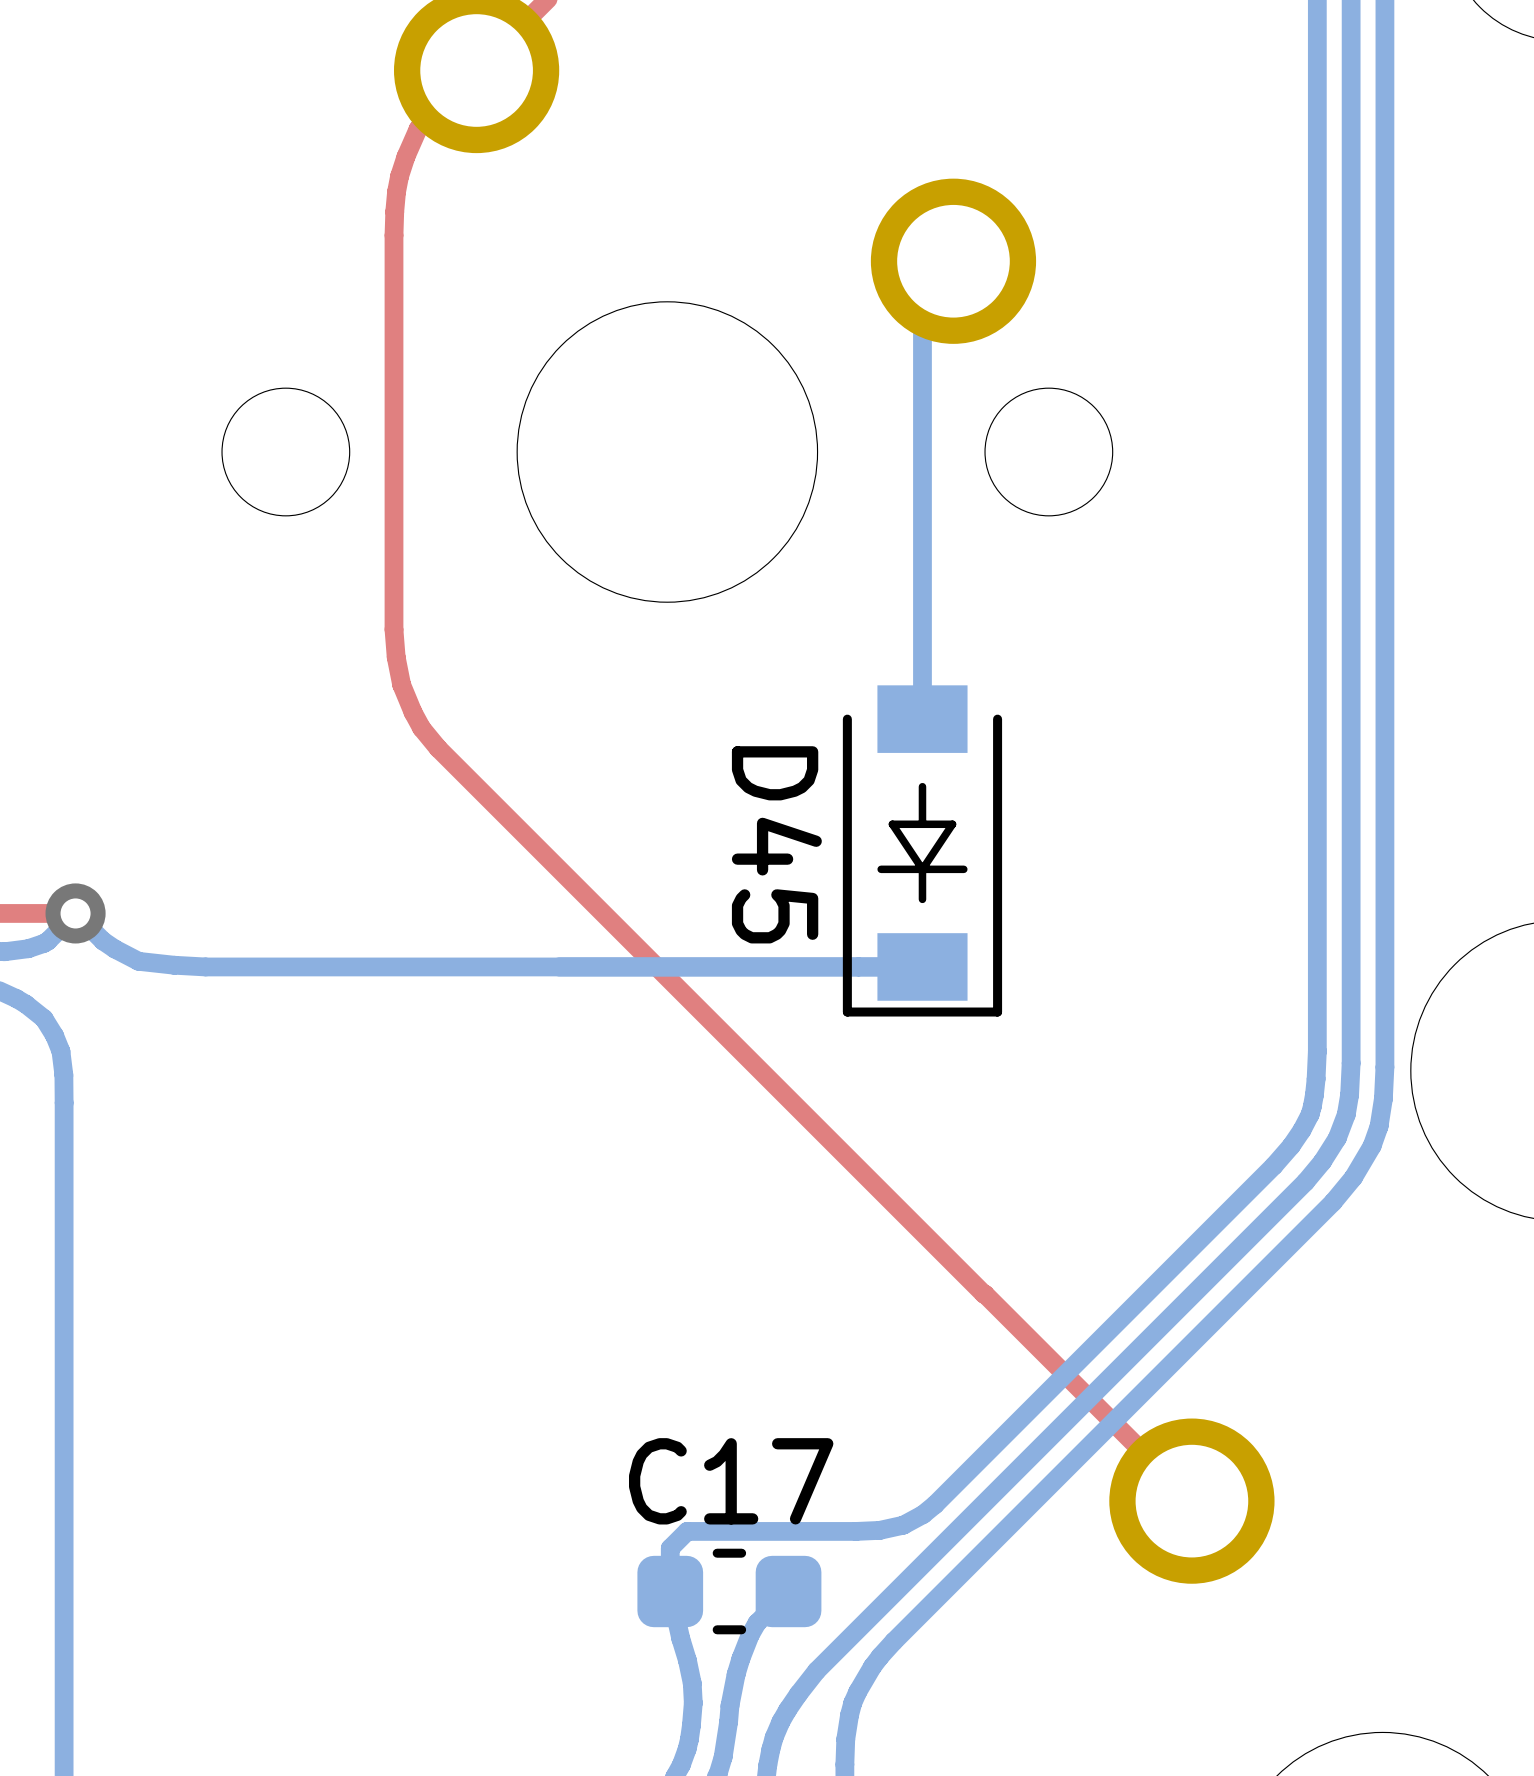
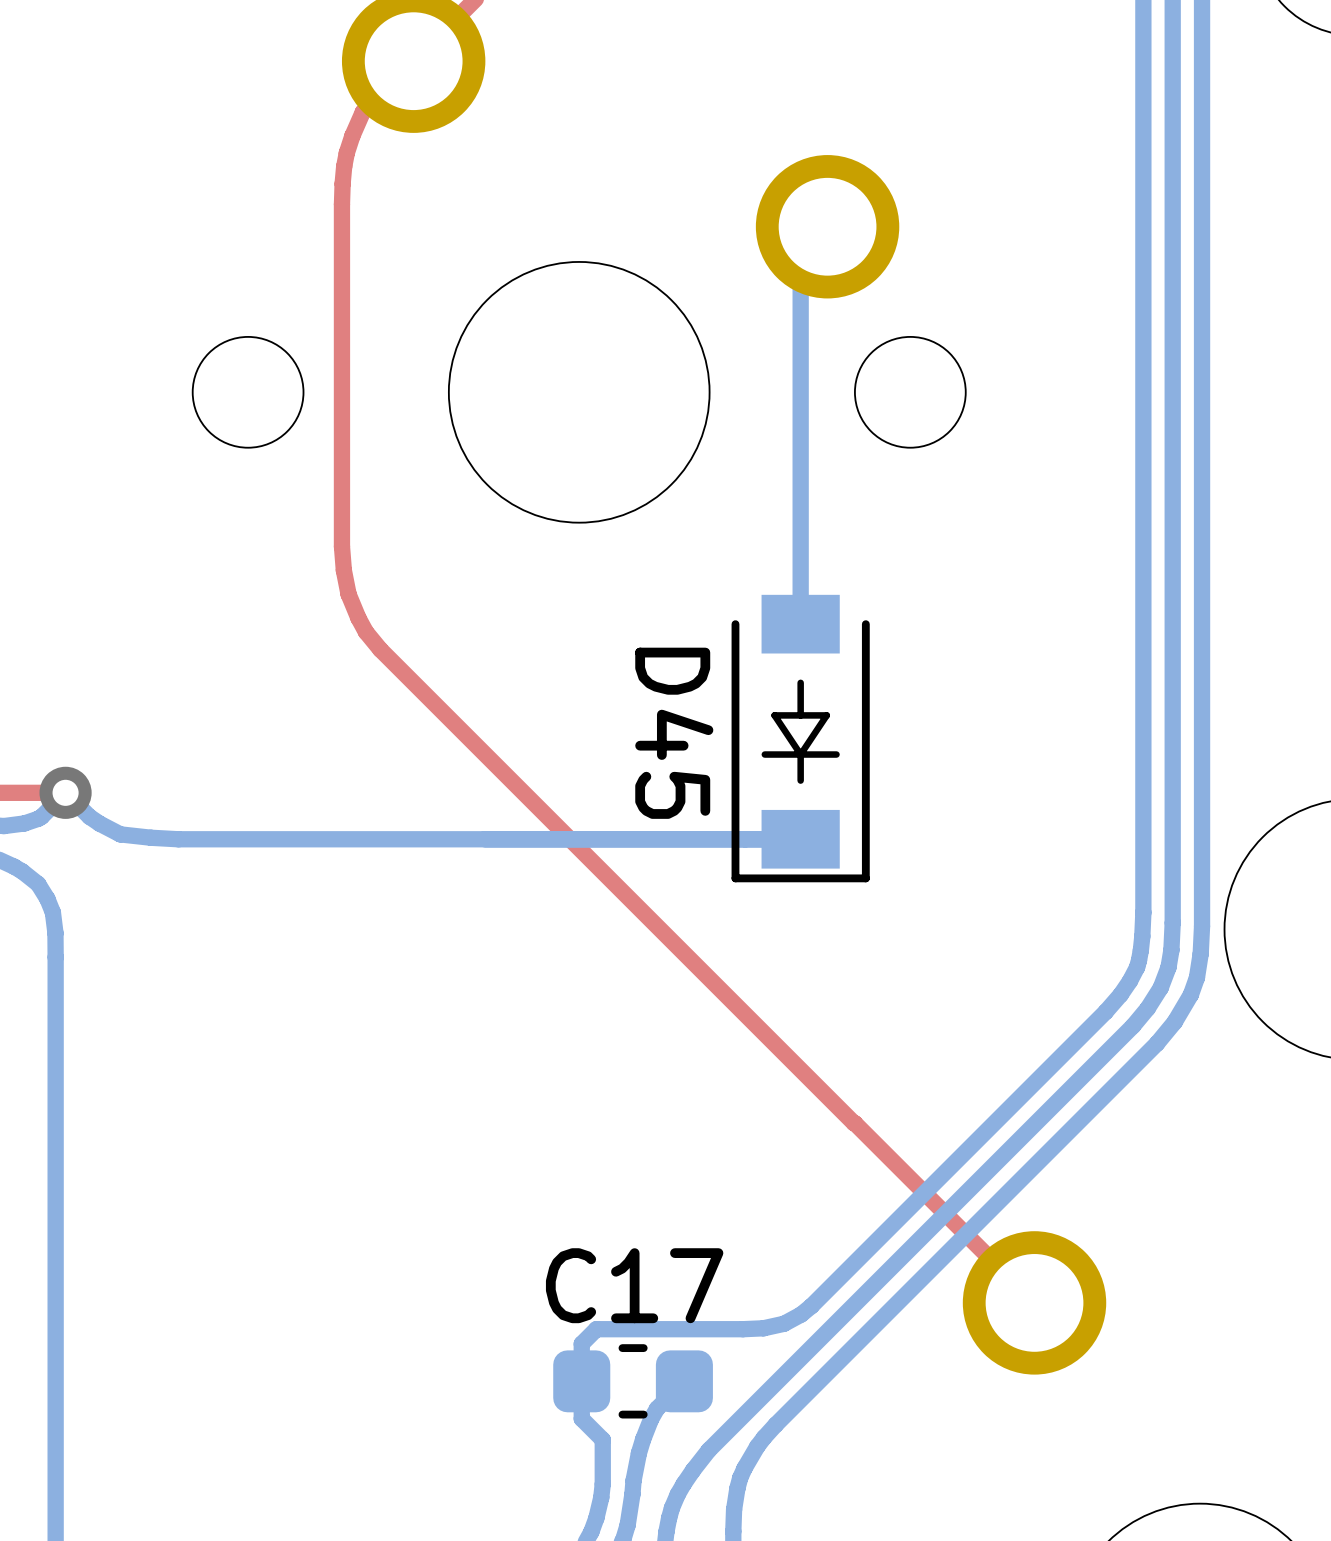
bottom track: (670, 1591) (692, 1683) (693, 1702) (689, 1739) -> (581, 1397) (581, 1418) (602, 1439) (602, 1483) (598, 1509)

